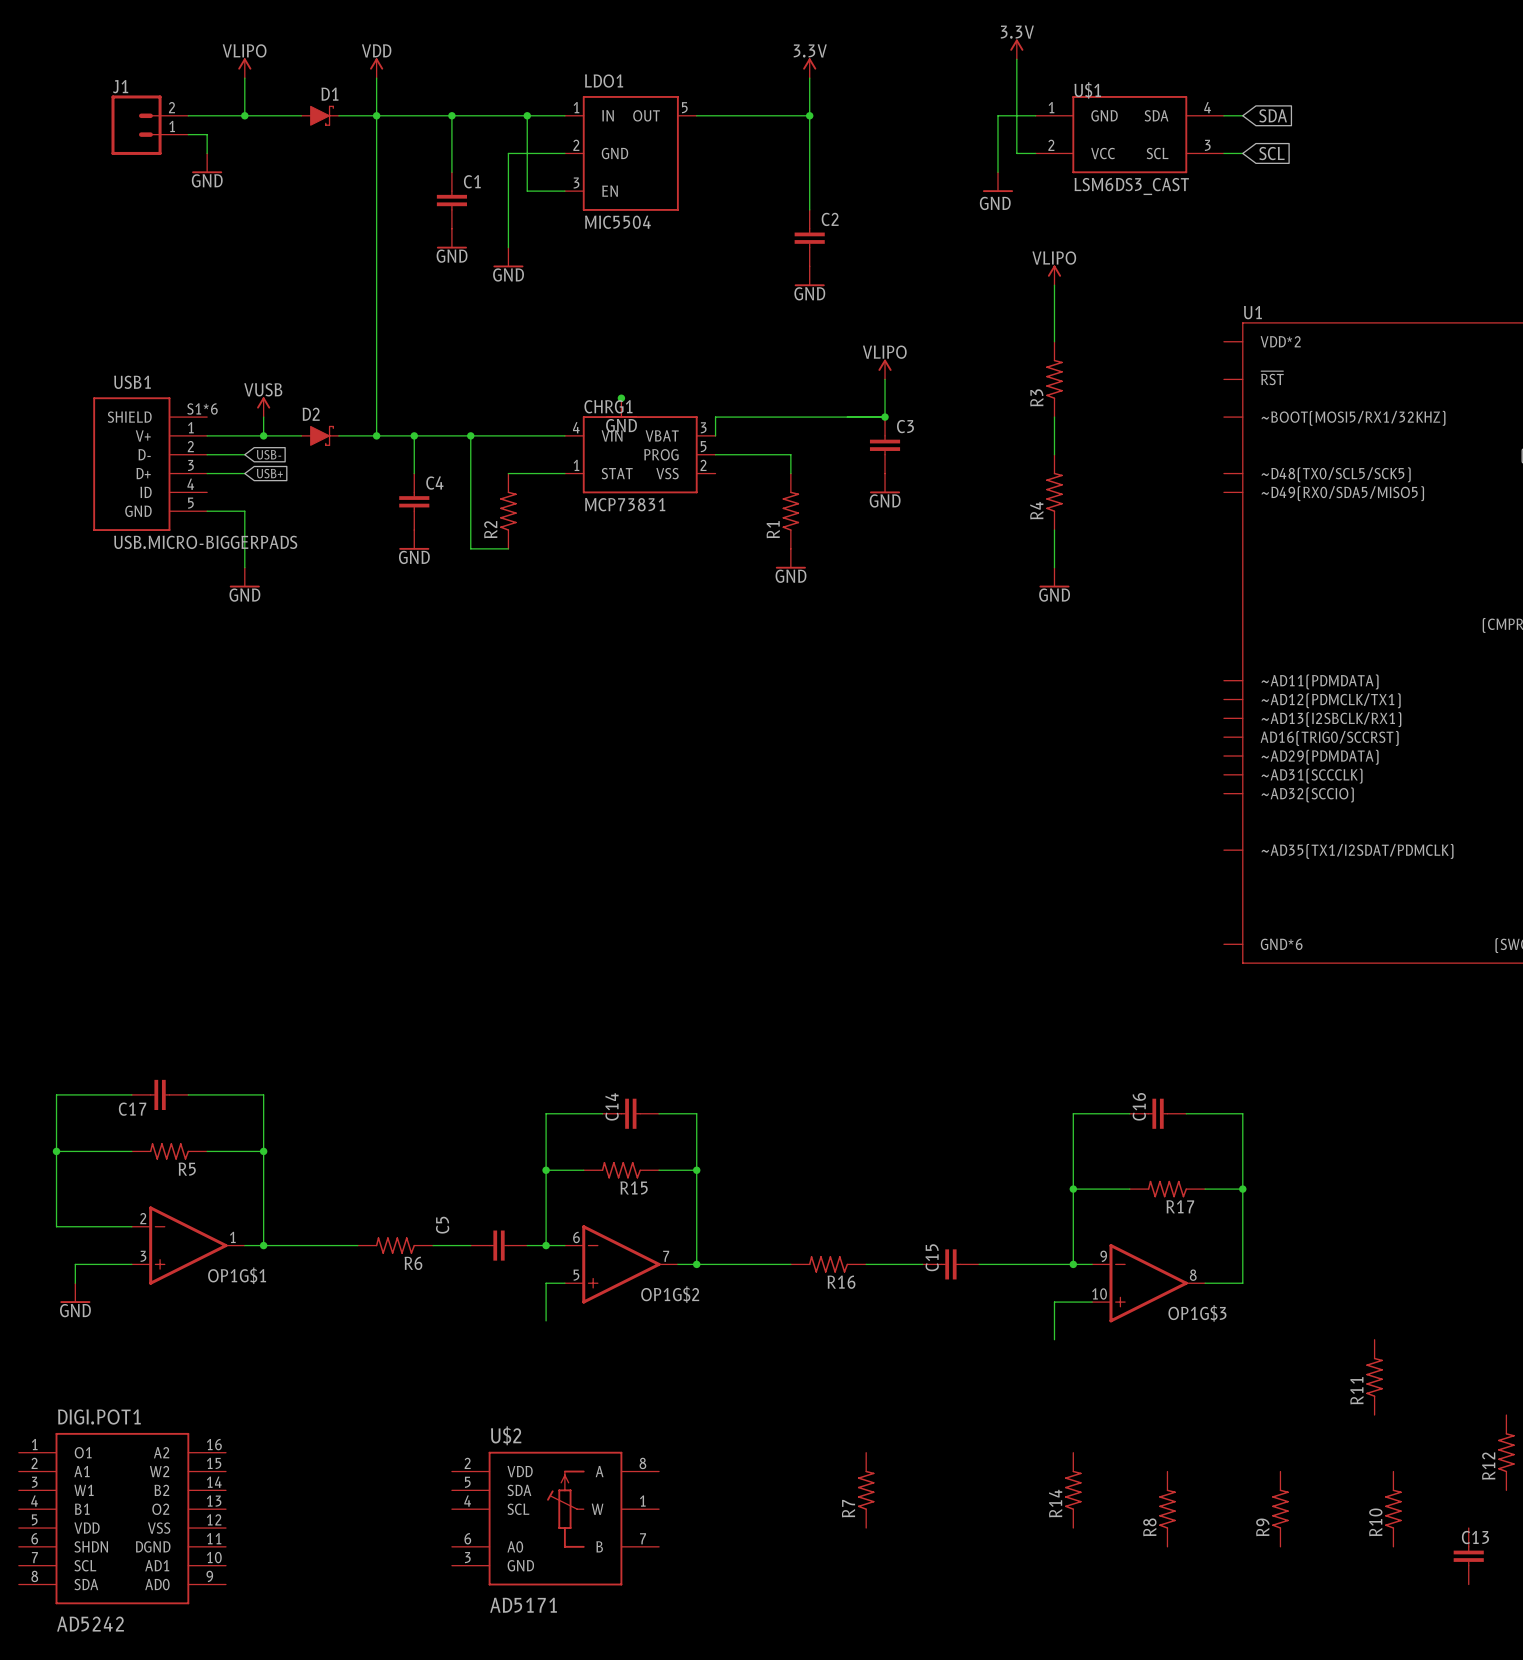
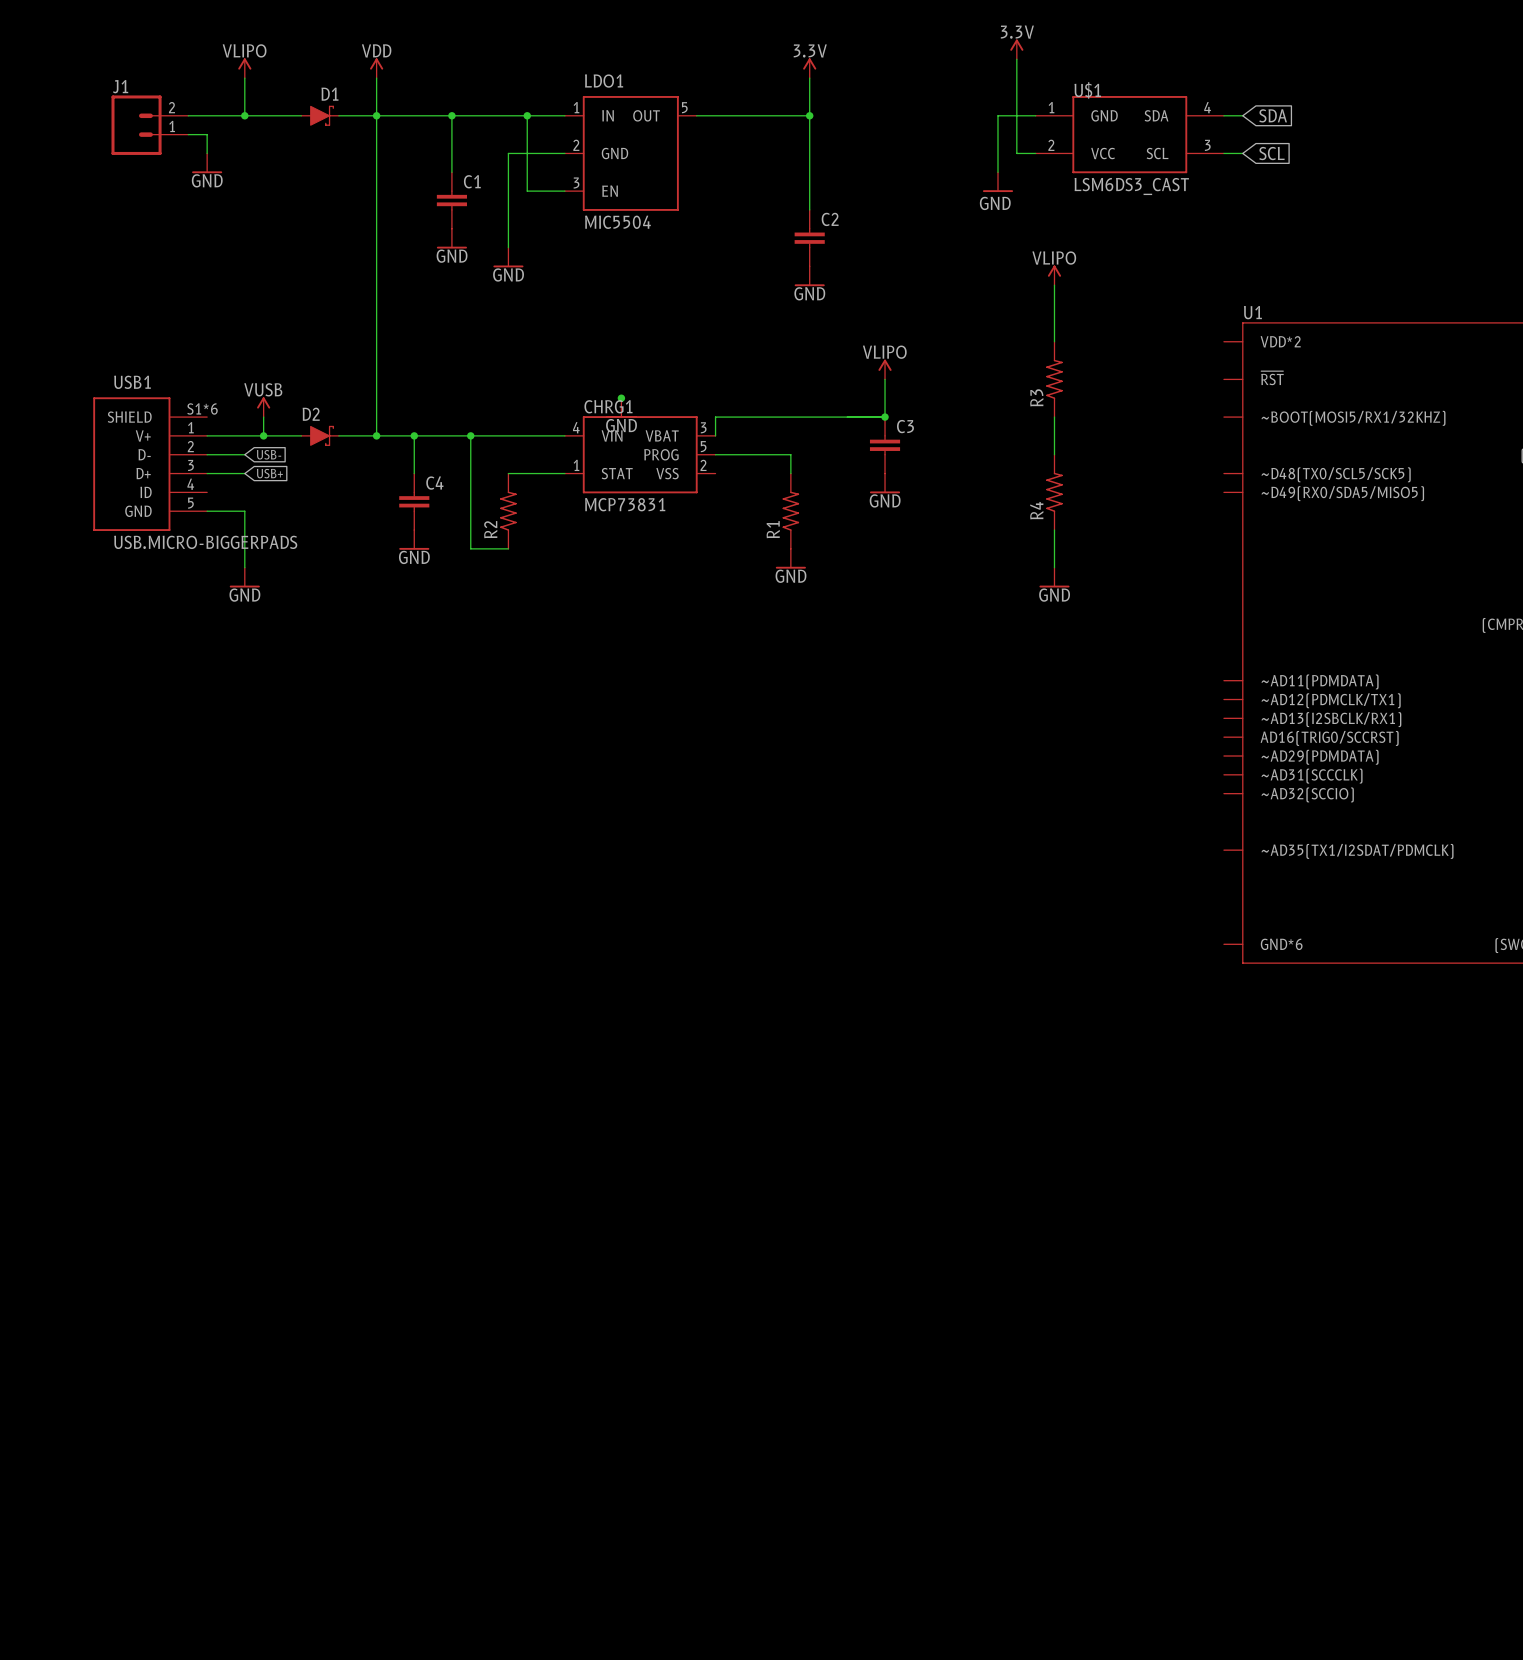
wire: (131, 1094) (56, 1094) (56, 1226) (131, 1226) -> none
C17: (160, 1094) -> none
wire: (188, 1094) (263, 1094) (263, 1245) -> none
wire: (602, 1113) (546, 1113) (546, 1245) -> none
C14: (630, 1113) -> none
wire: (659, 1113) (696, 1113) (696, 1264) -> none
wire: (1129, 1113) (1073, 1113) (1073, 1264) -> none
C16: (1158, 1113) -> none
wire: (1186, 1113) (1242, 1113) (1242, 1283) (1205, 1283) -> none
wire: (56, 1151) (131, 1151) -> none
junction: (56, 1151) -> none
R5: (169, 1151) -> none
wire: (207, 1151) (263, 1151) -> none
junction: (263, 1151) -> none
wire: (546, 1170) (583, 1170) -> none
junction: (546, 1170) -> none
R15: (621, 1170) -> none
wire: (659, 1170) (696, 1170) -> none
junction: (696, 1170) -> none
wire: (1073, 1189) (1129, 1189) -> none
junction: (1073, 1189) -> none
R17: (1167, 1189) -> none
wire: (1205, 1189) (1242, 1189) -> none
junction: (1242, 1189) -> none
OP1G$1: (188, 1245) -> none
wire: (244, 1245) (357, 1245) -> none
junction: (263, 1245) -> none
R6: (395, 1245) -> none
wire: (433, 1245) (470, 1245) -> none
C5: (499, 1245) -> none
wire: (527, 1245) (564, 1245) -> none
junction: (546, 1245) -> none
wire: (131, 1264) (75, 1264) (75, 1283) -> none
OP1G$2: (621, 1264) -> none
wire: (677, 1264) (790, 1264) -> none
junction: (696, 1264) -> none
R16: (828, 1264) -> none
wire: (866, 1264) (922, 1264) -> none
C15: (950, 1264) -> none
wire: (979, 1264) (1092, 1264) -> none
junction: (1073, 1264) -> none
wire: (564, 1283) (546, 1283) (546, 1320) -> none
OP1G$3: (1148, 1283) -> none
power symbol: GND (75, 1293) -> none
wire: (1092, 1302) (1054, 1302) (1054, 1339) -> none
R11: (1374, 1377) -> none
R12: (1506, 1452) -> none
R7: (866, 1490) -> none
R14: (1073, 1490) -> none
R8: (1167, 1509) -> none
R9: (1280, 1509) -> none
R10: (1393, 1509) -> none
DIGI.POT1: AD5242 (122, 1518) -> none
U$2: AD5171 (555, 1518) -> none
C13: (1468, 1556) -> none

